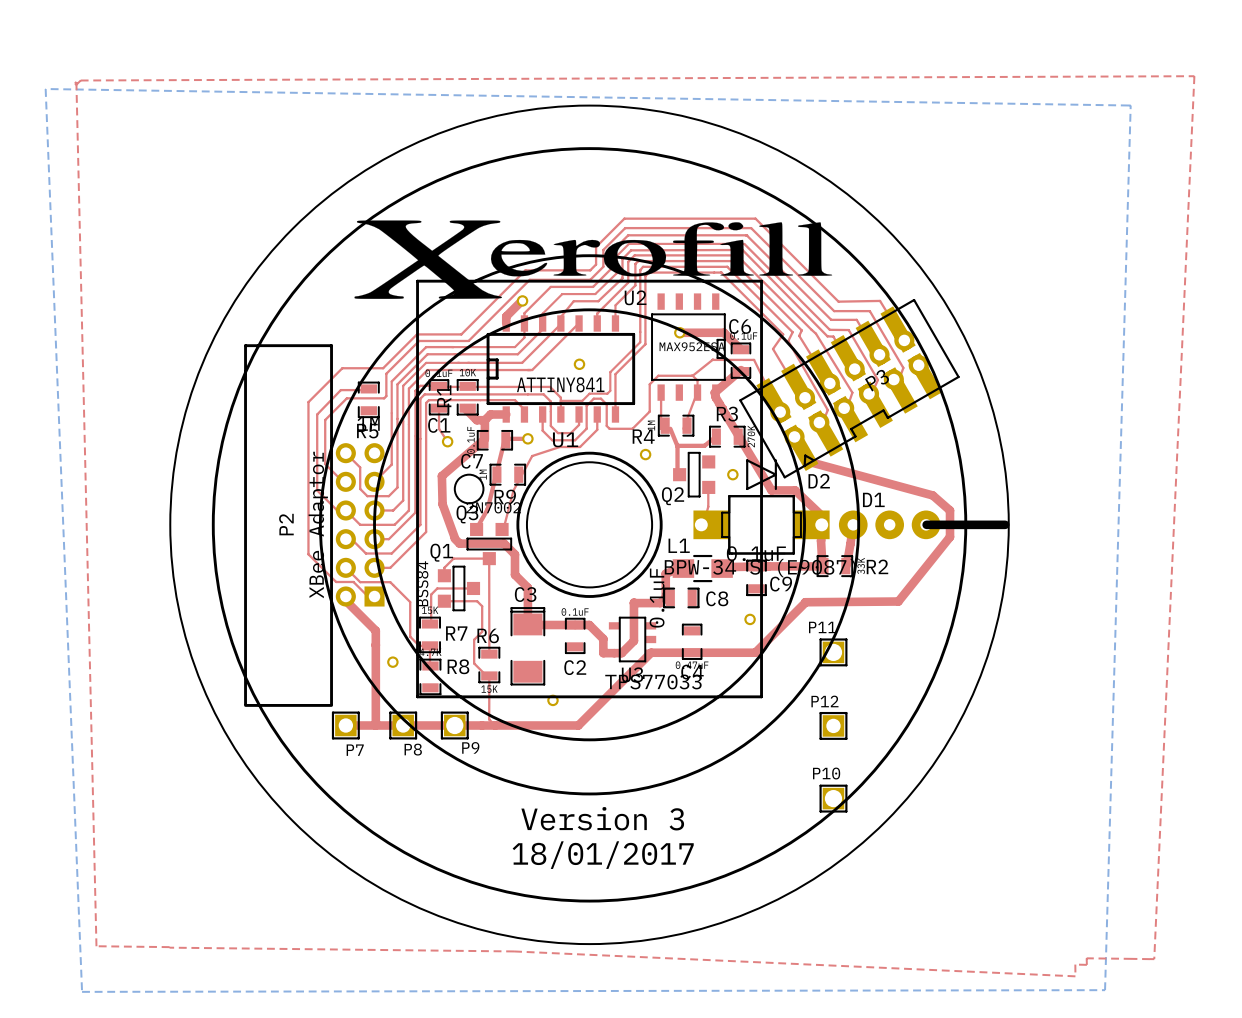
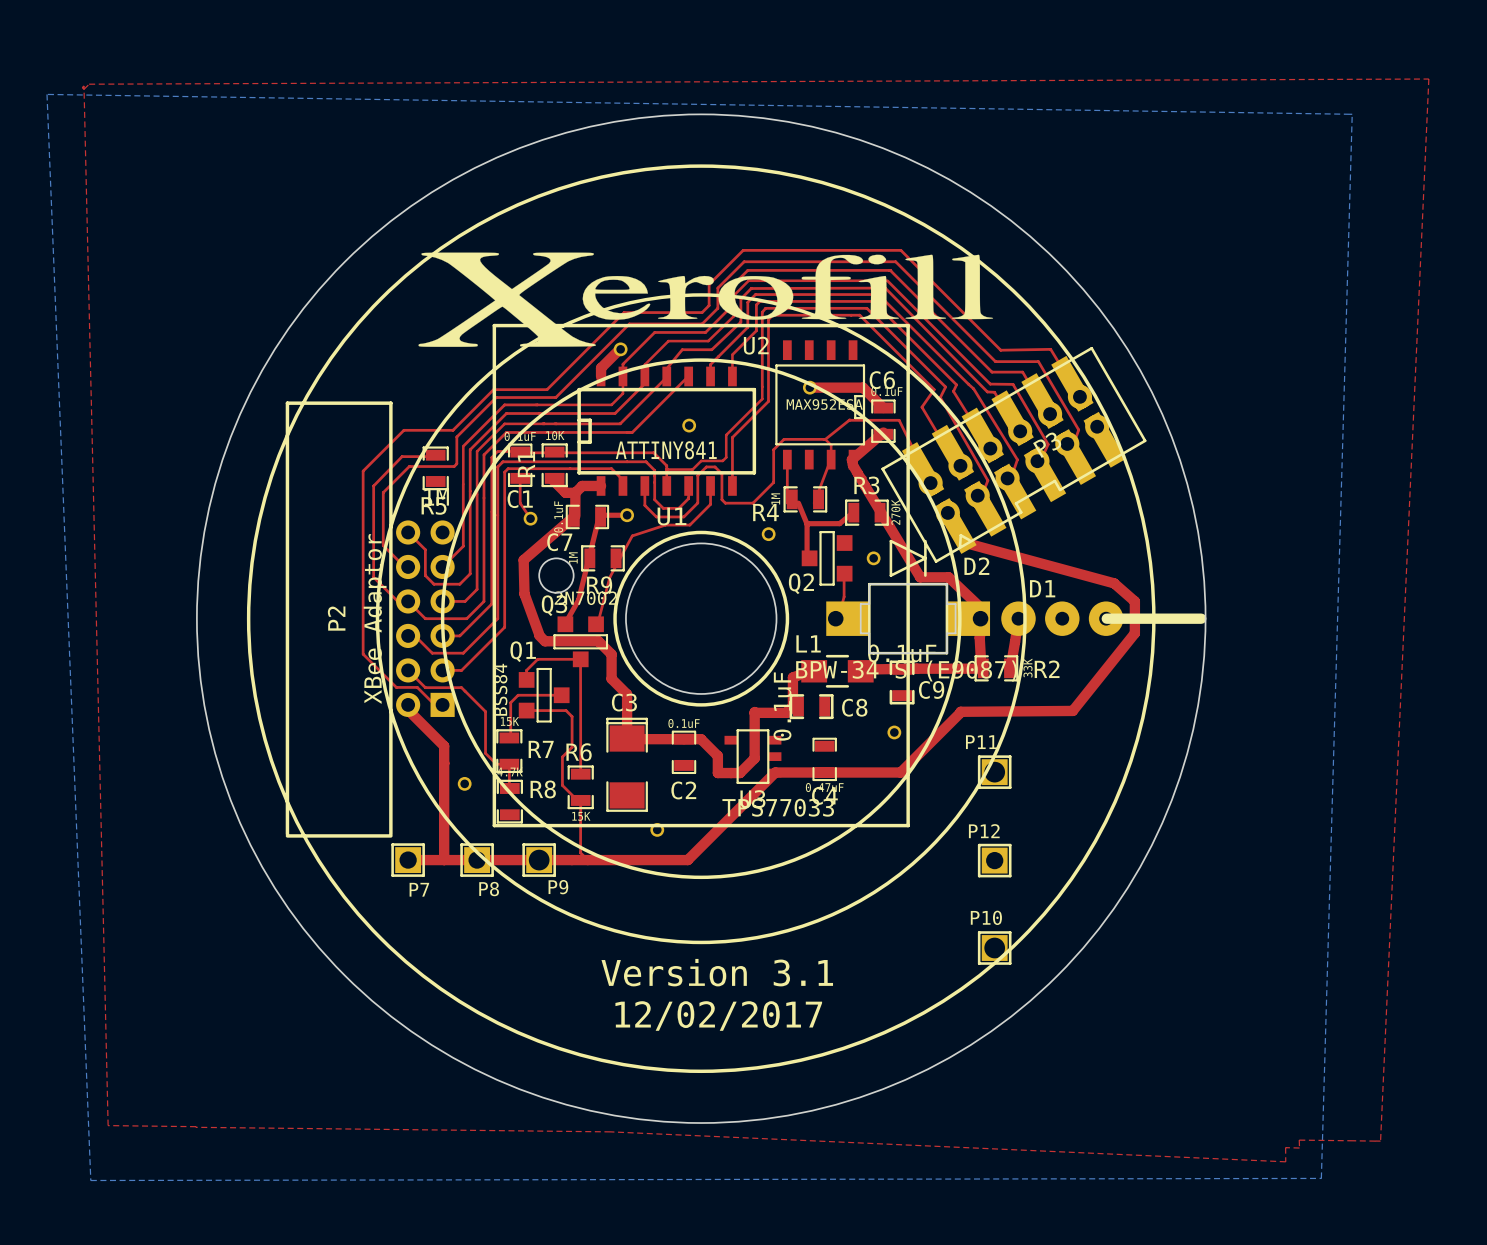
text: Version 3 (602, 818) -> Version 3.1 (717, 972)
text: 18/01/2017 (603, 855) -> 12/02/2017 (718, 1016)

